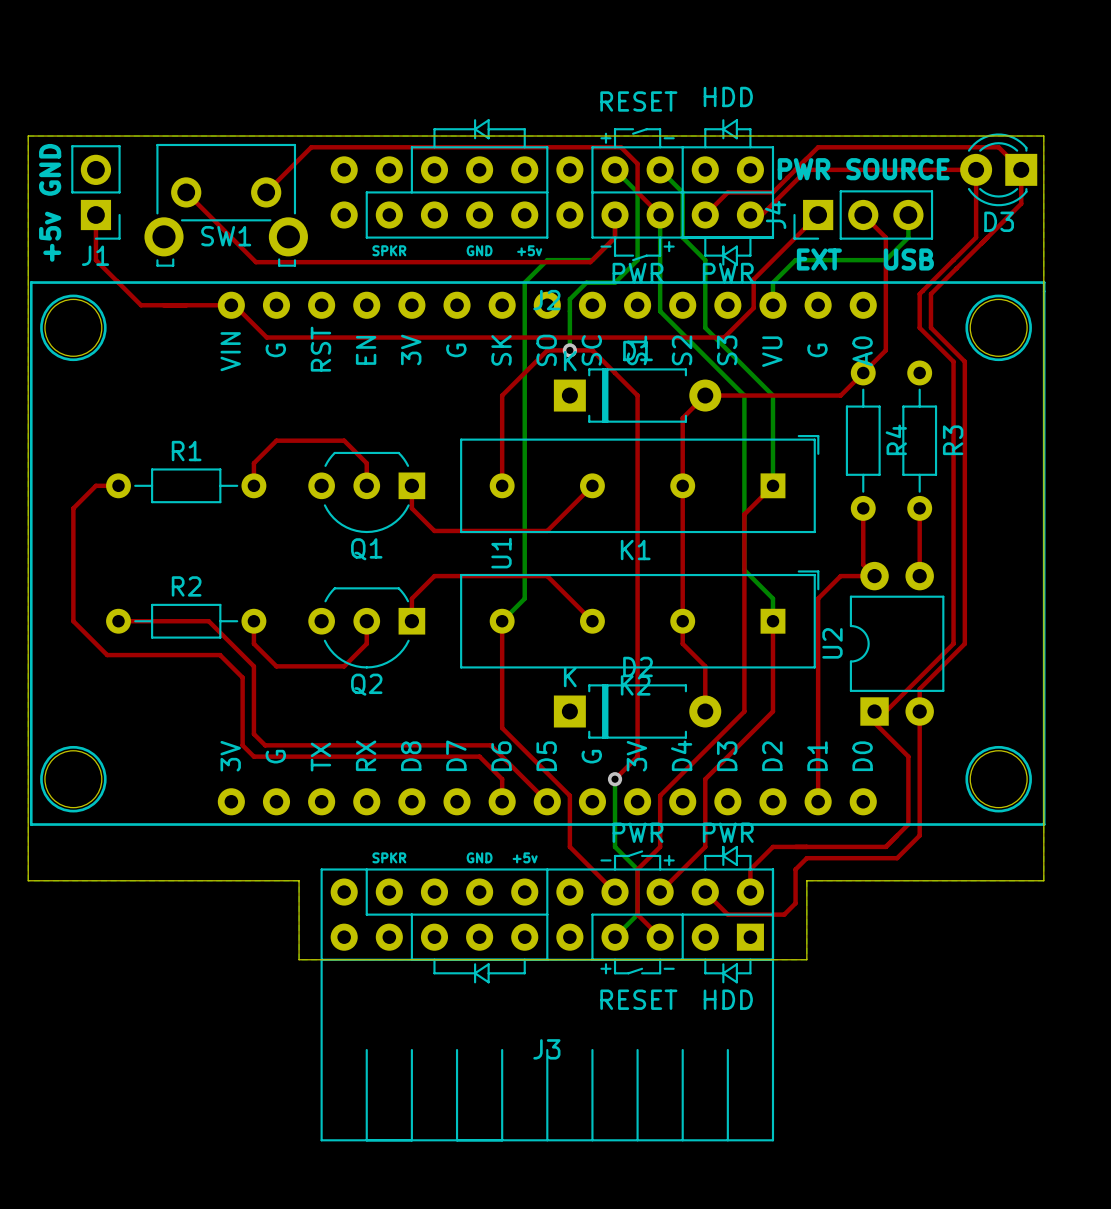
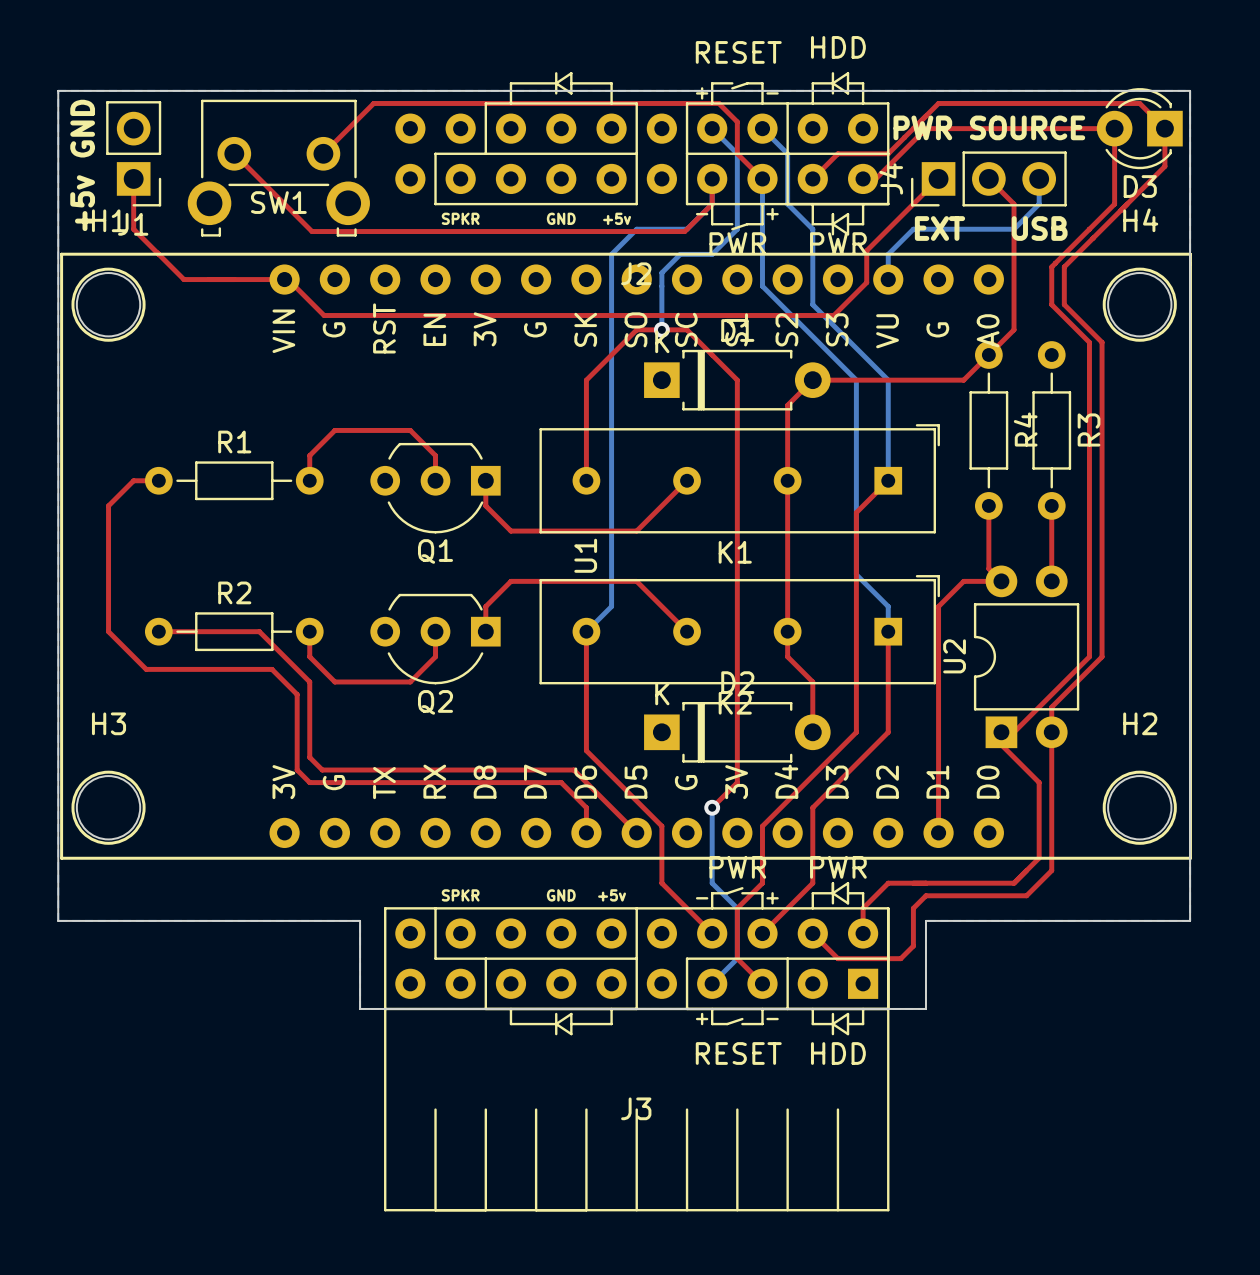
H1 name: none -> H1 (109, 220)
H4 name: none -> H4 (1140, 220)
H3 name: none -> H3 (109, 723)
H2 name: none -> H2 (1140, 723)

